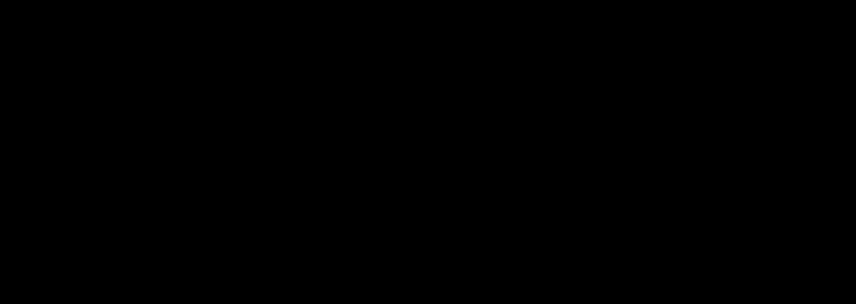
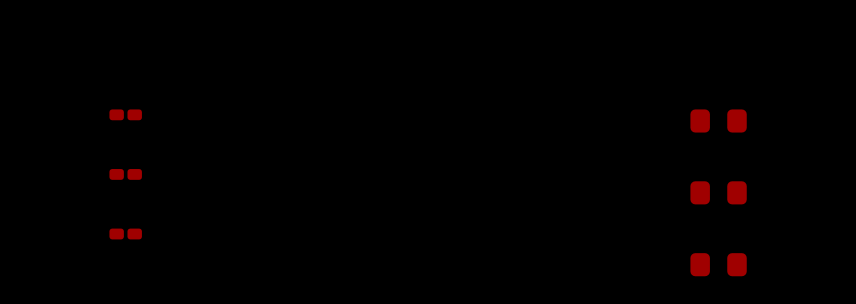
part: none -> (125, 114)
part: none -> (718, 120)
part: none -> (125, 174)
part: none -> (718, 192)
part: none -> (125, 234)
part: none -> (718, 264)

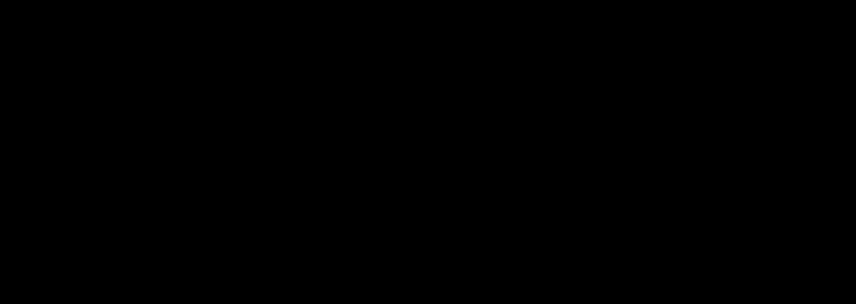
part: (125, 114) -> none
part: (718, 120) -> none
part: (125, 174) -> none
part: (718, 192) -> none
part: (125, 234) -> none
part: (718, 264) -> none

